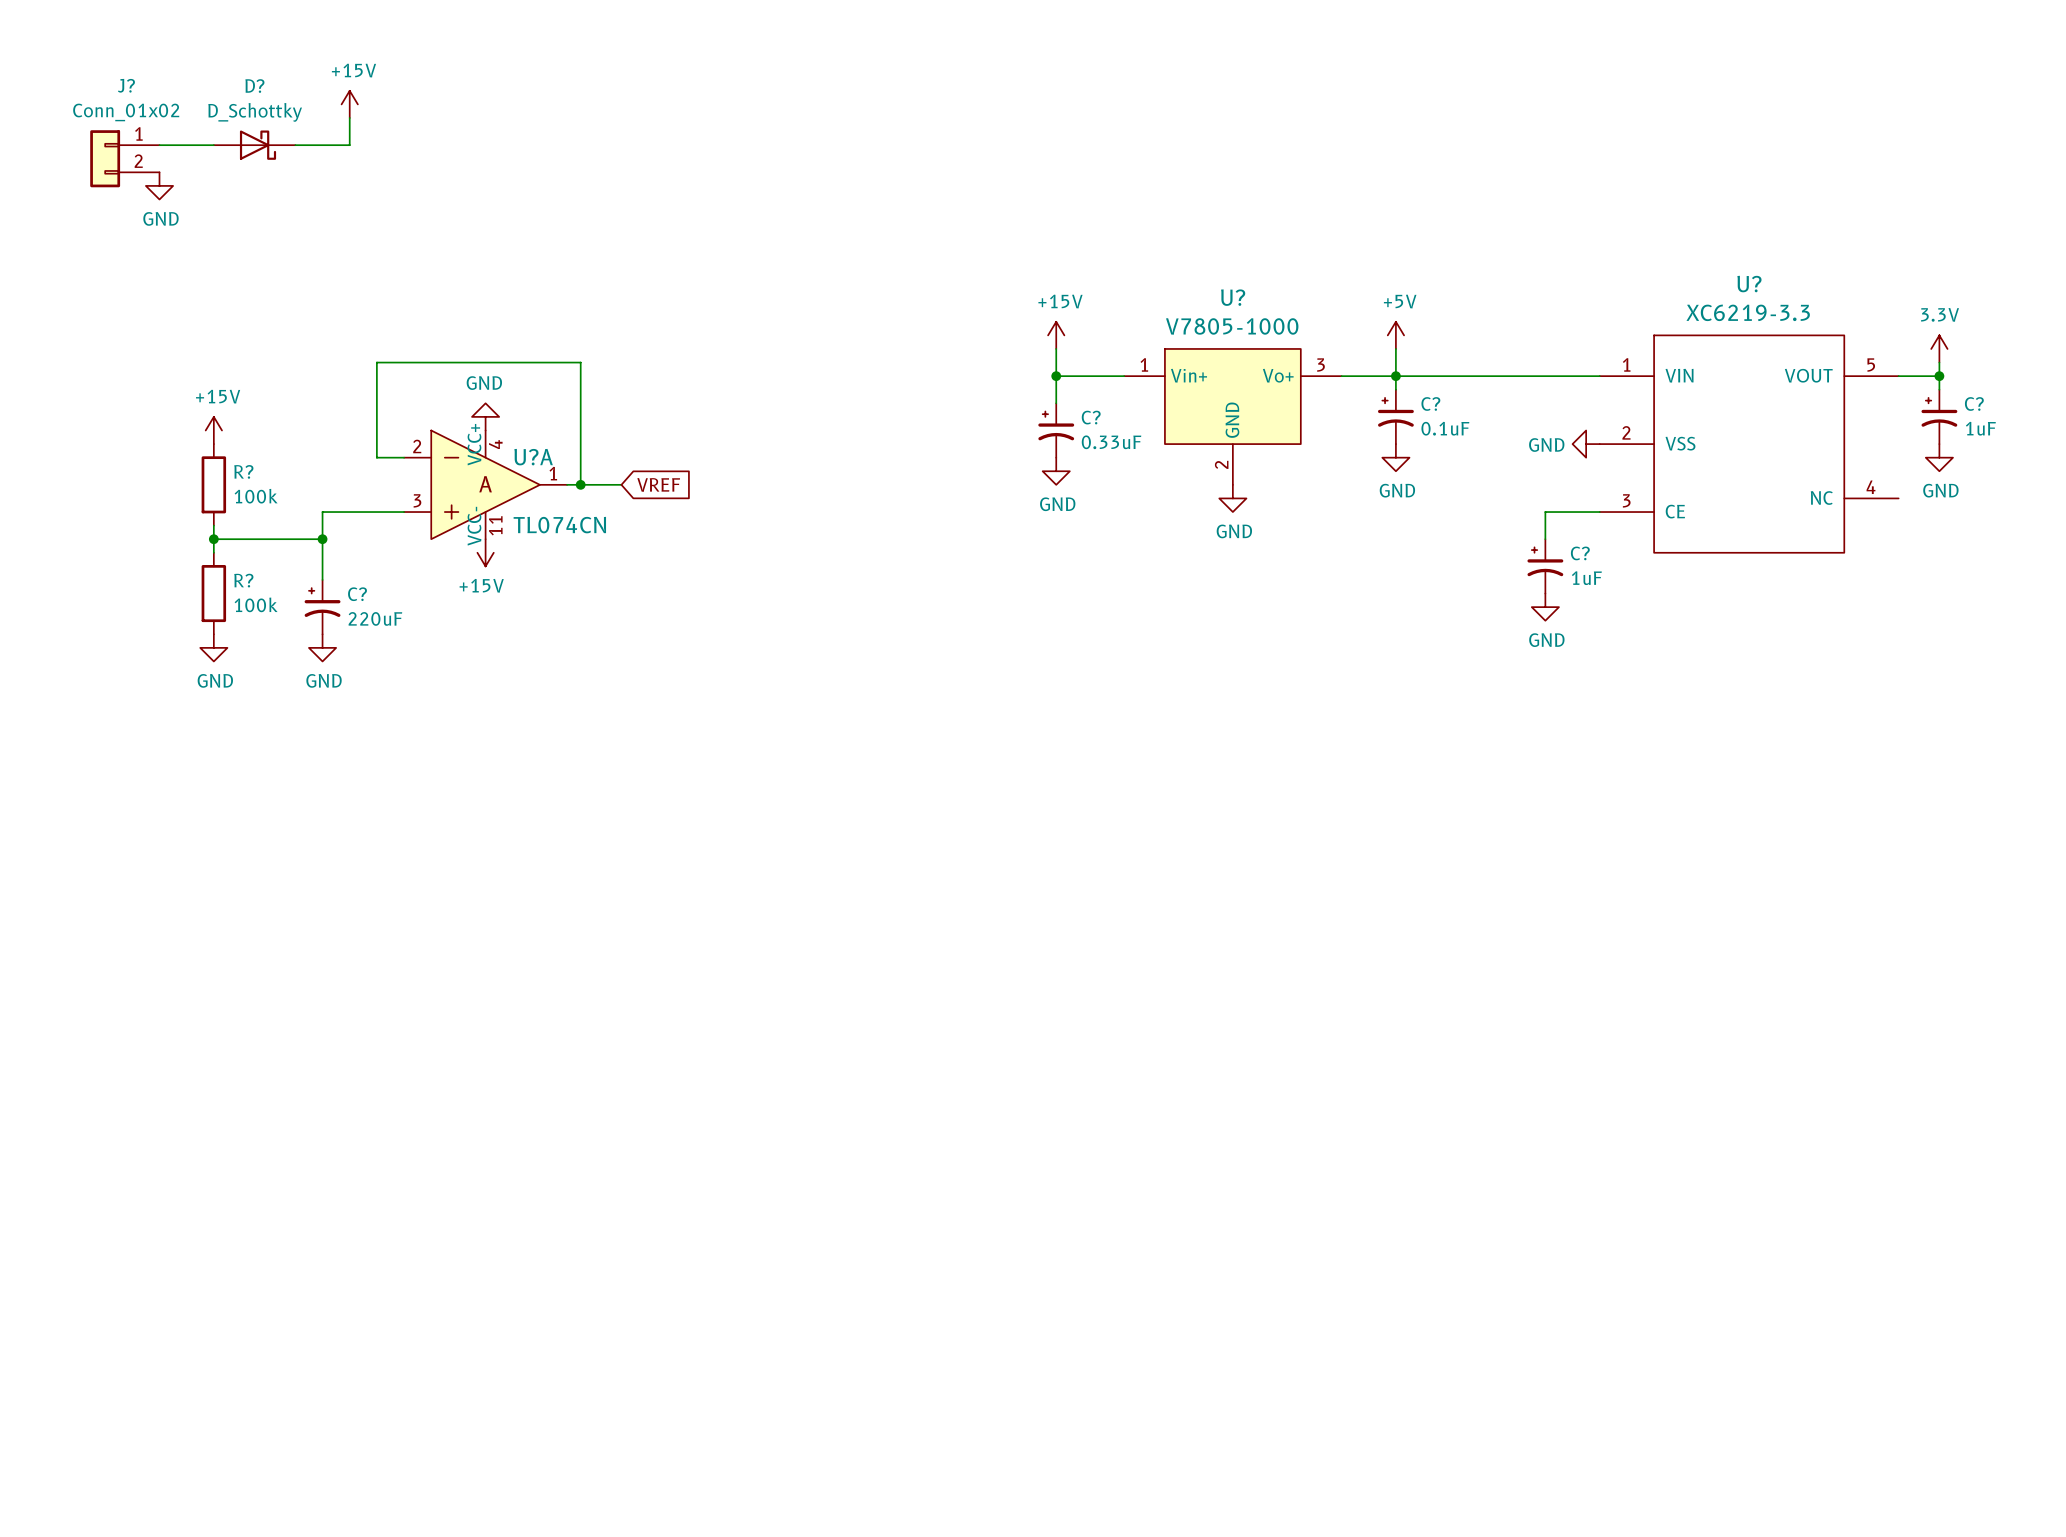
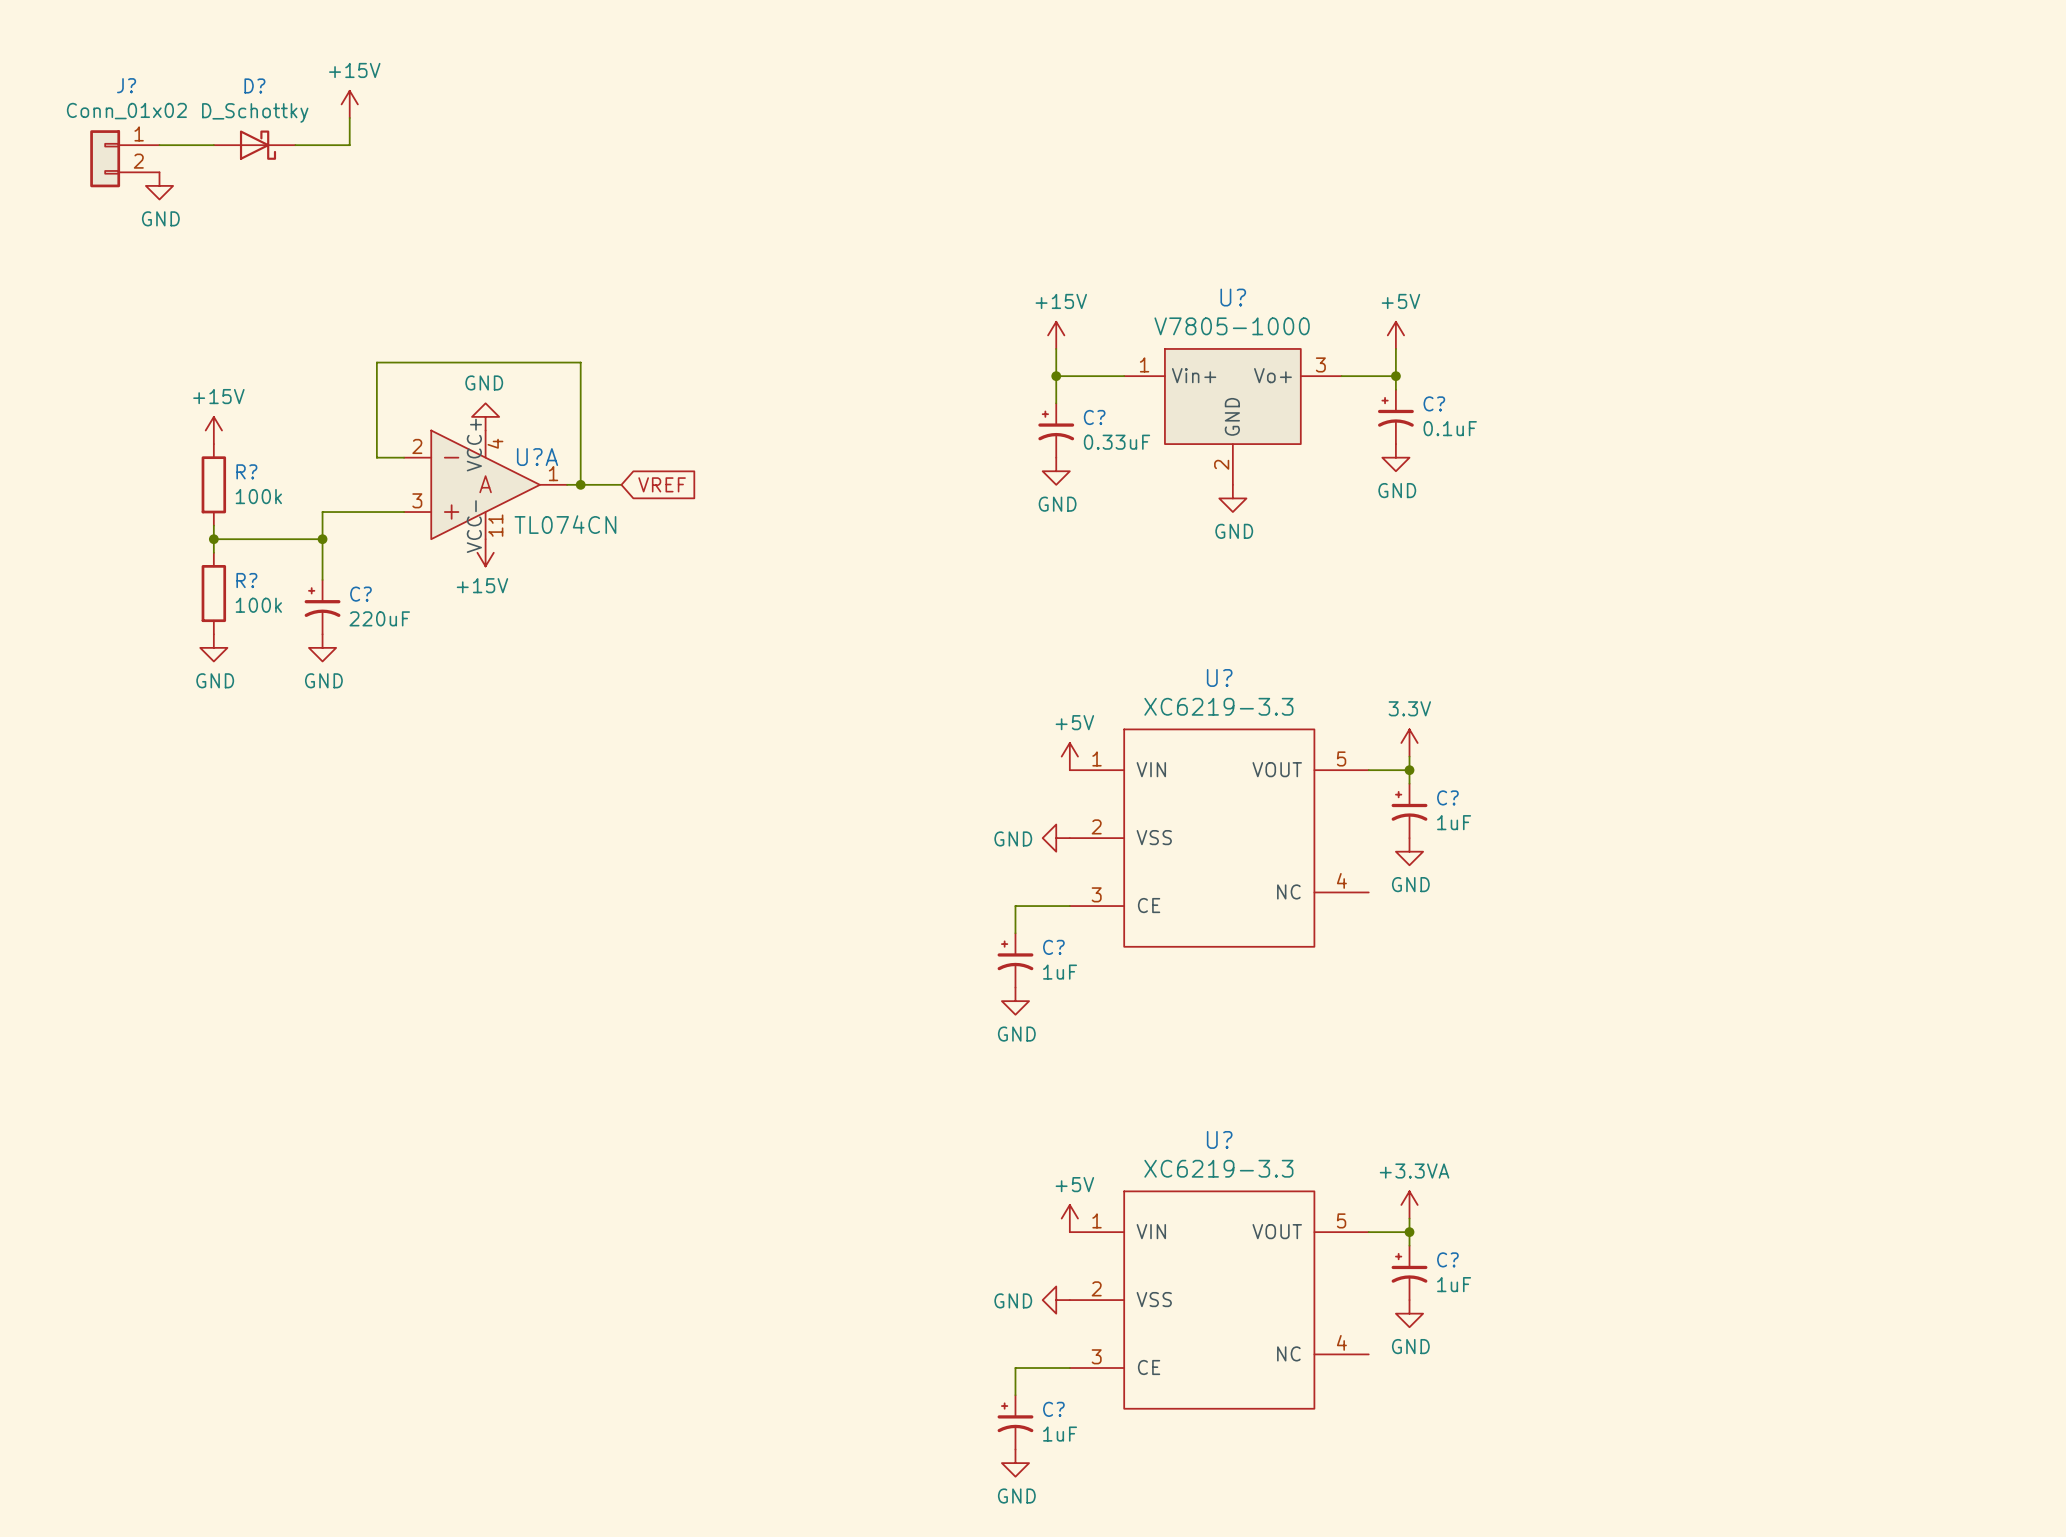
power symbol: 3.3V (1939, 348) -> none
wire: (1939, 362) (1939, 389) -> none
wire: (1395, 376) (1599, 376) -> none
wire: (1898, 376) (1939, 376) -> none
junction: (1939, 376) -> none
C?: 1uF (1939, 416) -> none
power symbol: GND (1586, 444) -> none
U?: XC6219-3.3 (1749, 444) -> none
power symbol: GND (1939, 457) -> none
wire: (1599, 512) (1545, 512) (1545, 539) -> none
C?: 1uF (1545, 566) -> none
power symbol: GND (1545, 607) -> none
power symbol: none -> 3.3V (1409, 742)
power symbol: none -> +5V (1069, 756)
wire: none -> (1409, 756) (1409, 783)
wire: none -> (1368, 770) (1409, 770)
junction: none -> (1409, 770)
C?: none -> 1uF (1409, 810)
power symbol: none -> GND (1056, 838)
U?: none -> XC6219-3.3 (1219, 838)
power symbol: none -> GND (1409, 851)
wire: none -> (1069, 906) (1015, 906) (1015, 933)
C?: none -> 1uF (1015, 960)
power symbol: none -> GND (1015, 1001)
power symbol: none -> +3.3VA (1409, 1204)
power symbol: none -> +5V (1069, 1218)
wire: none -> (1409, 1218) (1409, 1245)
wire: none -> (1368, 1232) (1409, 1232)
junction: none -> (1409, 1232)
C?: none -> 1uF (1409, 1272)
power symbol: none -> GND (1056, 1300)
U?: none -> XC6219-3.3 (1219, 1300)
power symbol: none -> GND (1409, 1313)
wire: none -> (1069, 1368) (1015, 1368) (1015, 1395)
C?: none -> 1uF (1015, 1422)
power symbol: none -> GND (1015, 1463)

